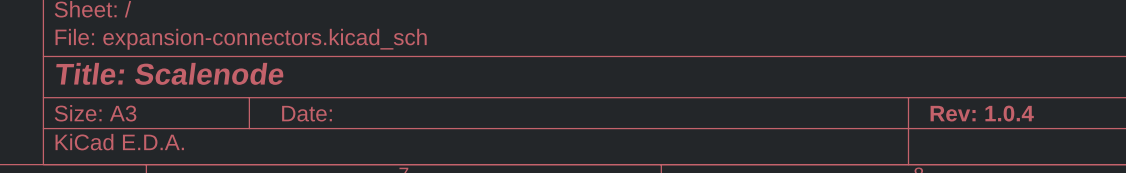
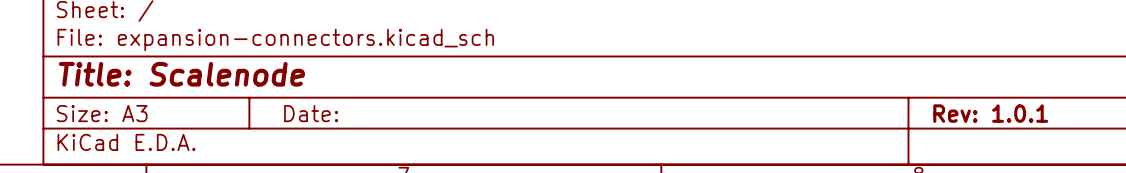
title block: Rev: 1.0.4 (982, 113) -> Rev: 1.0.1 (990, 113)

